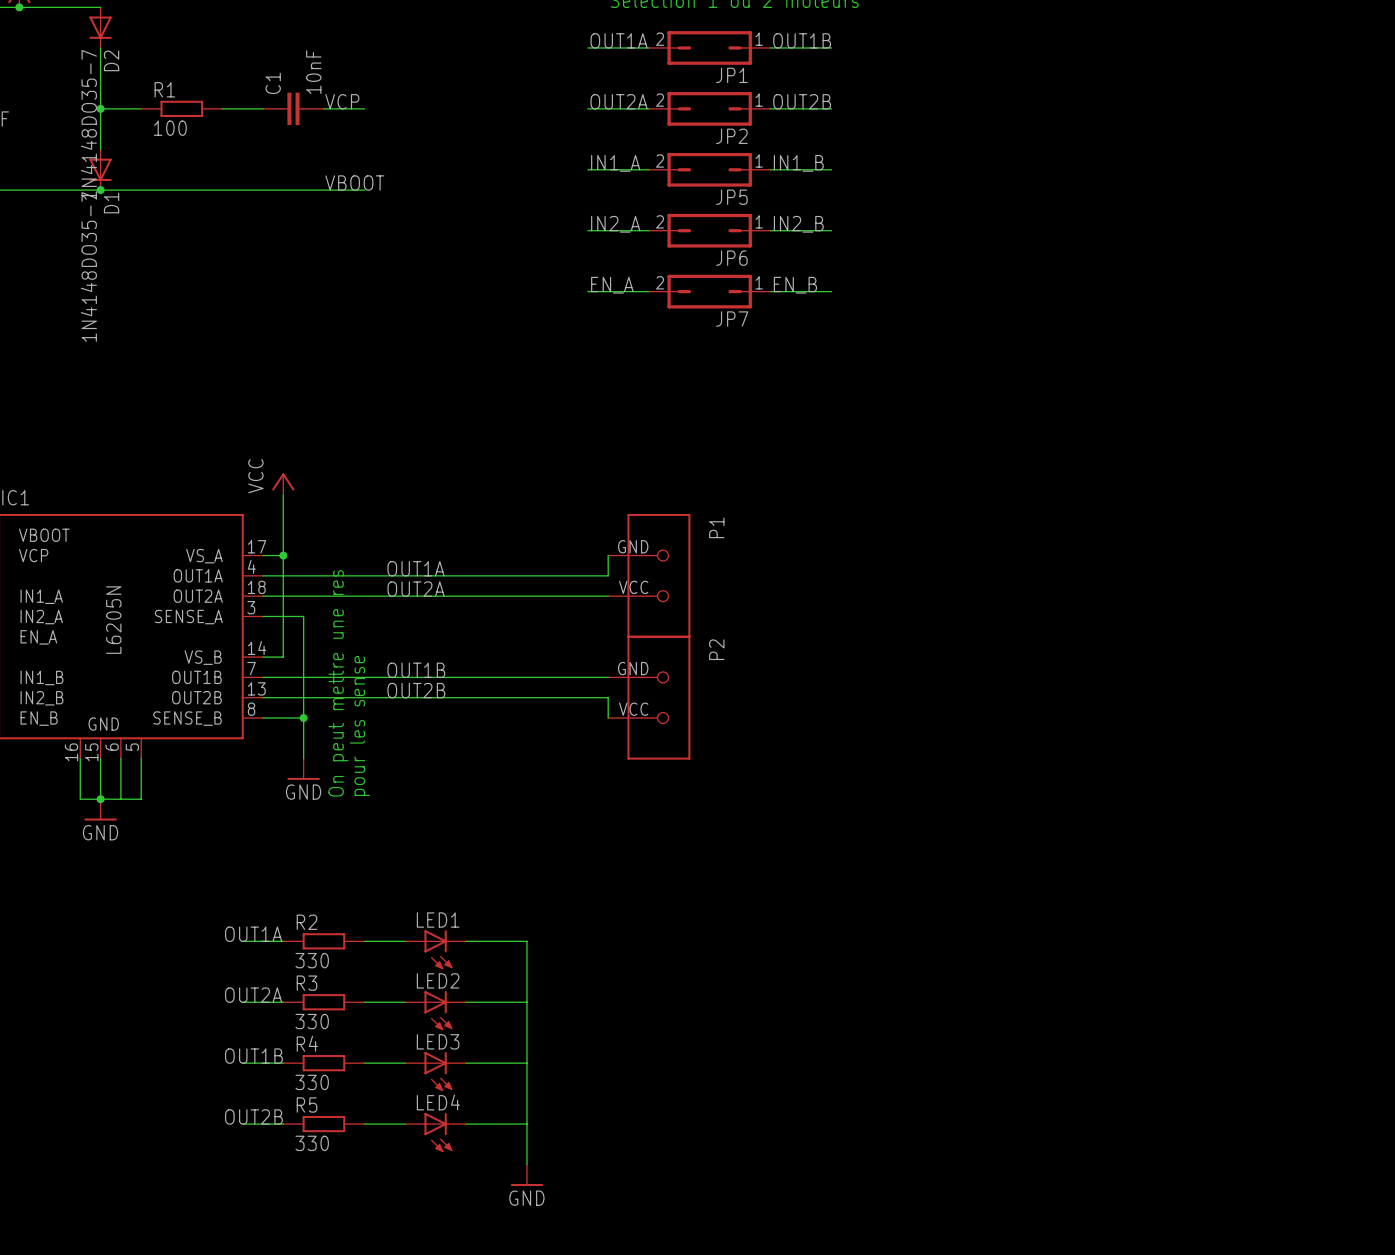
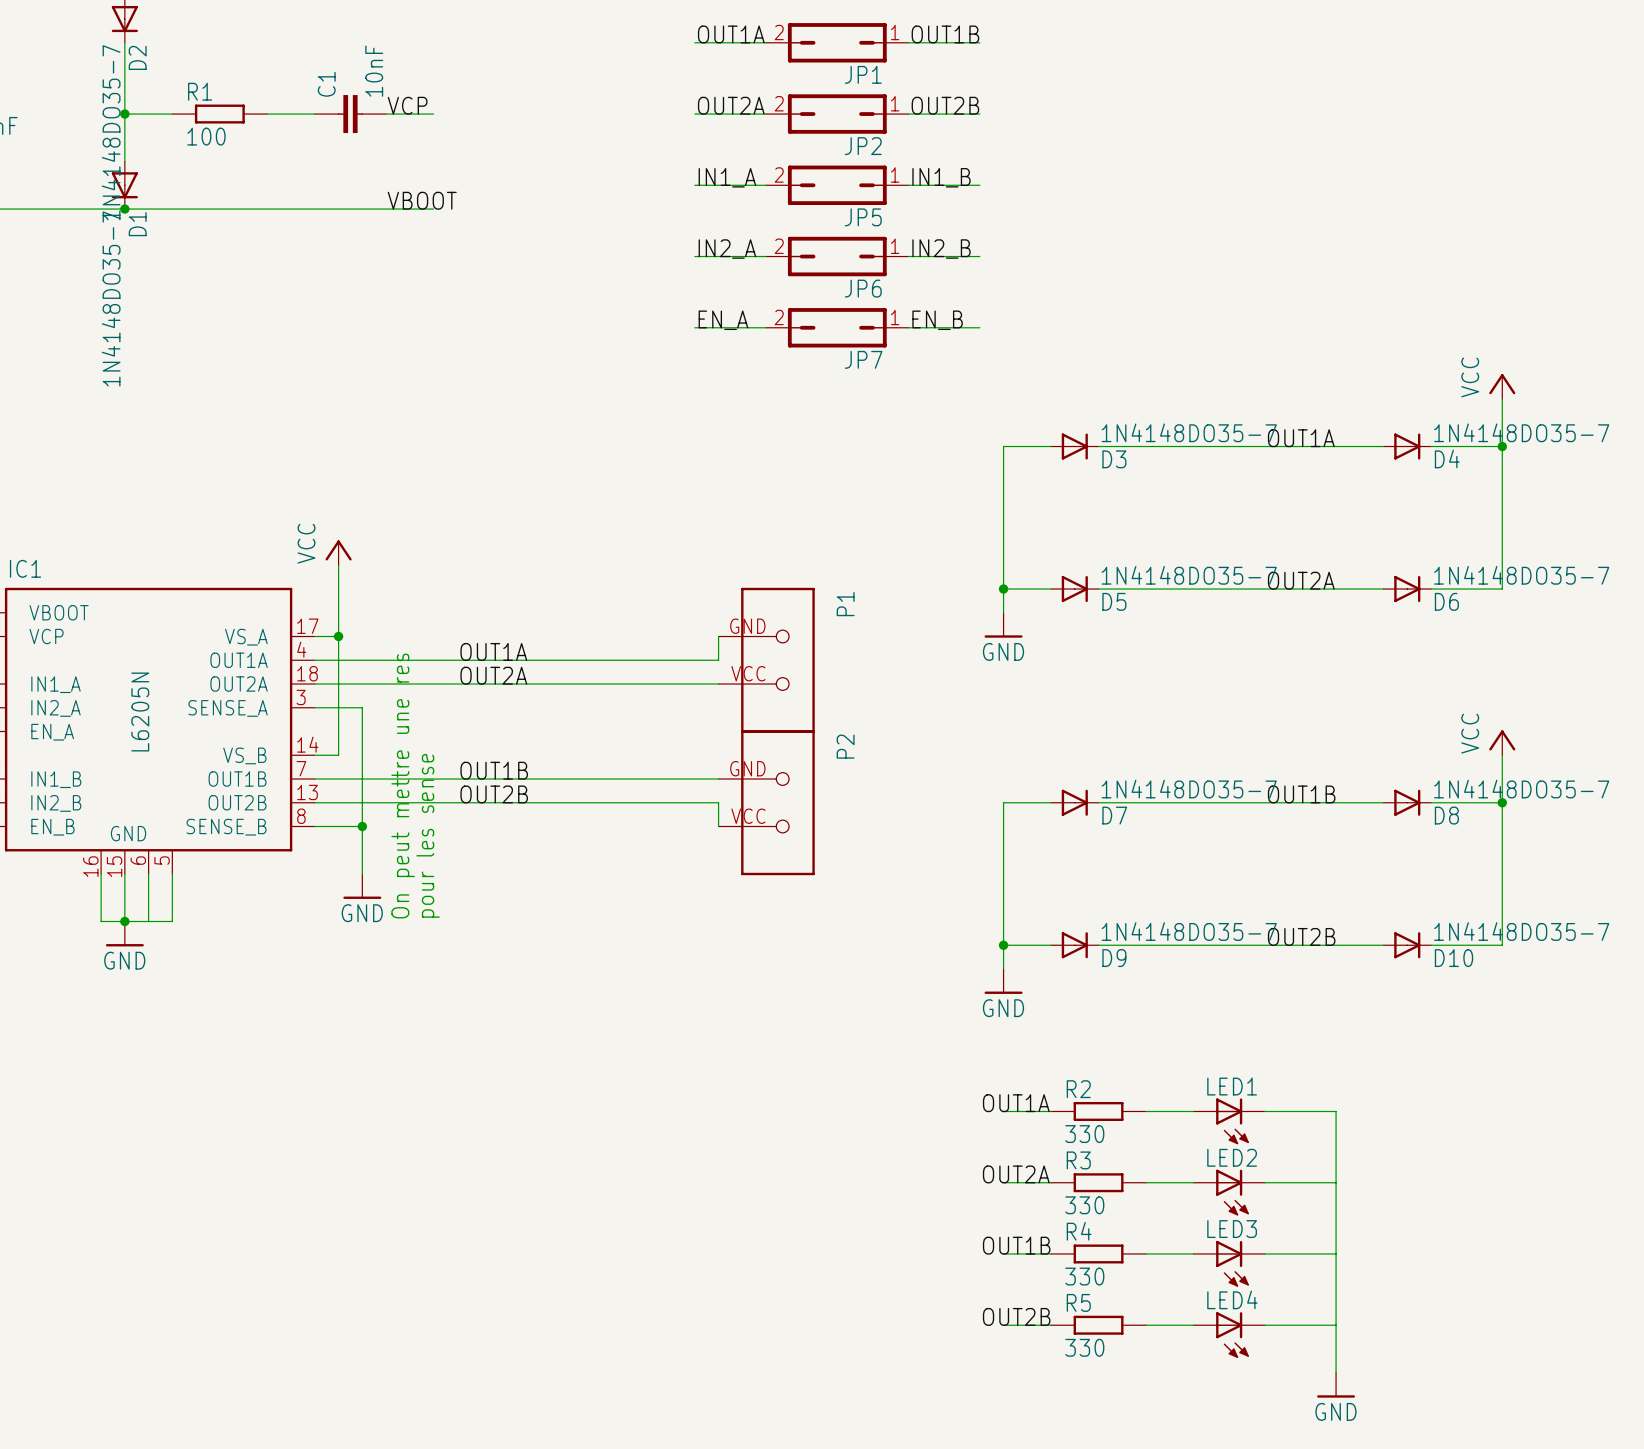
power symbol: none -> VCC (1502, 386)
wire: none -> (1502, 399) (1502, 589) (1431, 589)
label: none -> OUT1A (1301, 438)
wire: none -> (1051, 446) (1003, 446) (1003, 612)
D3: none -> 1N4148DO35-7 (1074, 446)
wire: none -> (1098, 446) (1383, 446)
D4: none -> 1N4148DO35-7 (1407, 446)
wire: none -> (1431, 446) (1502, 446)
junction: none -> (1502, 446)
label: none -> OUT2A (1301, 580)
wire: none -> (1003, 589) (1051, 589)
junction: none -> (1003, 589)
D5: none -> 1N4148DO35-7 (1074, 589)
wire: none -> (1098, 589) (1383, 589)
D6: none -> 1N4148DO35-7 (1407, 589)
power symbol: none -> GND (1003, 625)
power symbol: none -> VCC (1502, 742)
wire: none -> (1502, 755) (1502, 945) (1431, 945)
label: none -> OUT1B (1301, 794)
wire: none -> (1051, 802) (1003, 802) (1003, 968)
D7: none -> 1N4148DO35-7 (1074, 802)
wire: none -> (1098, 802) (1383, 802)
D8: none -> 1N4148DO35-7 (1407, 802)
wire: none -> (1431, 802) (1502, 802)
junction: none -> (1502, 802)
label: none -> OUT2B (1301, 936)
wire: none -> (1003, 945) (1051, 945)
junction: none -> (1003, 945)
D9: none -> 1N4148DO35-7 (1074, 945)
wire: none -> (1098, 945) (1383, 945)
D10: none -> 1N4148DO35-7 (1407, 945)
power symbol: none -> GND (1003, 981)
label: OUT1A (253, 934) -> none
wire: (242, 941) (283, 941) -> none
R2 position: (323, 941) -> (1098, 1111)
wire: (364, 941) (405, 941) -> none
wire: (466, 941) (526, 941) (526, 1164) -> none
LED1 position: (435, 949) -> (1229, 1121)
label: none -> OUT1A (1016, 1103)
wire: none -> (1003, 1111) (1051, 1111)
wire: none -> (1146, 1111) (1193, 1111)
wire: none -> (1264, 1111) (1336, 1111) (1336, 1372)
label: OUT2A (253, 995) -> none
wire: (242, 1002) (283, 1002) -> none
R3 position: (323, 1002) -> (1098, 1182)
wire: (364, 1002) (405, 1002) -> none
wire: (466, 1002) (526, 1002) -> none
LED2 position: (435, 1010) -> (1229, 1192)
label: none -> OUT2A (1016, 1174)
wire: none -> (1003, 1182) (1051, 1182)
wire: none -> (1146, 1182) (1193, 1182)
wire: none -> (1264, 1182) (1336, 1182)
label: OUT1B (253, 1056) -> none
wire: (242, 1063) (283, 1063) -> none
R4 position: (323, 1063) -> (1098, 1253)
wire: (364, 1063) (405, 1063) -> none
wire: (466, 1063) (526, 1063) -> none
LED3 position: (435, 1071) -> (1229, 1263)
label: none -> OUT1B (1016, 1245)
wire: none -> (1003, 1253) (1051, 1253)
wire: none -> (1146, 1253) (1193, 1253)
wire: none -> (1264, 1253) (1336, 1253)
label: OUT2B (253, 1116) -> none
wire: (242, 1124) (283, 1124) -> none
R5 position: (323, 1124) -> (1098, 1325)
wire: (364, 1124) (405, 1124) -> none
wire: (466, 1124) (526, 1124) -> none
LED4 position: (435, 1132) -> (1229, 1335)
label: none -> OUT2B (1016, 1316)
wire: none -> (1003, 1325) (1051, 1325)
wire: none -> (1146, 1325) (1193, 1325)
wire: none -> (1264, 1325) (1336, 1325)
power symbol: GND (526, 1175) -> none
power symbol: none -> GND (1336, 1385)

